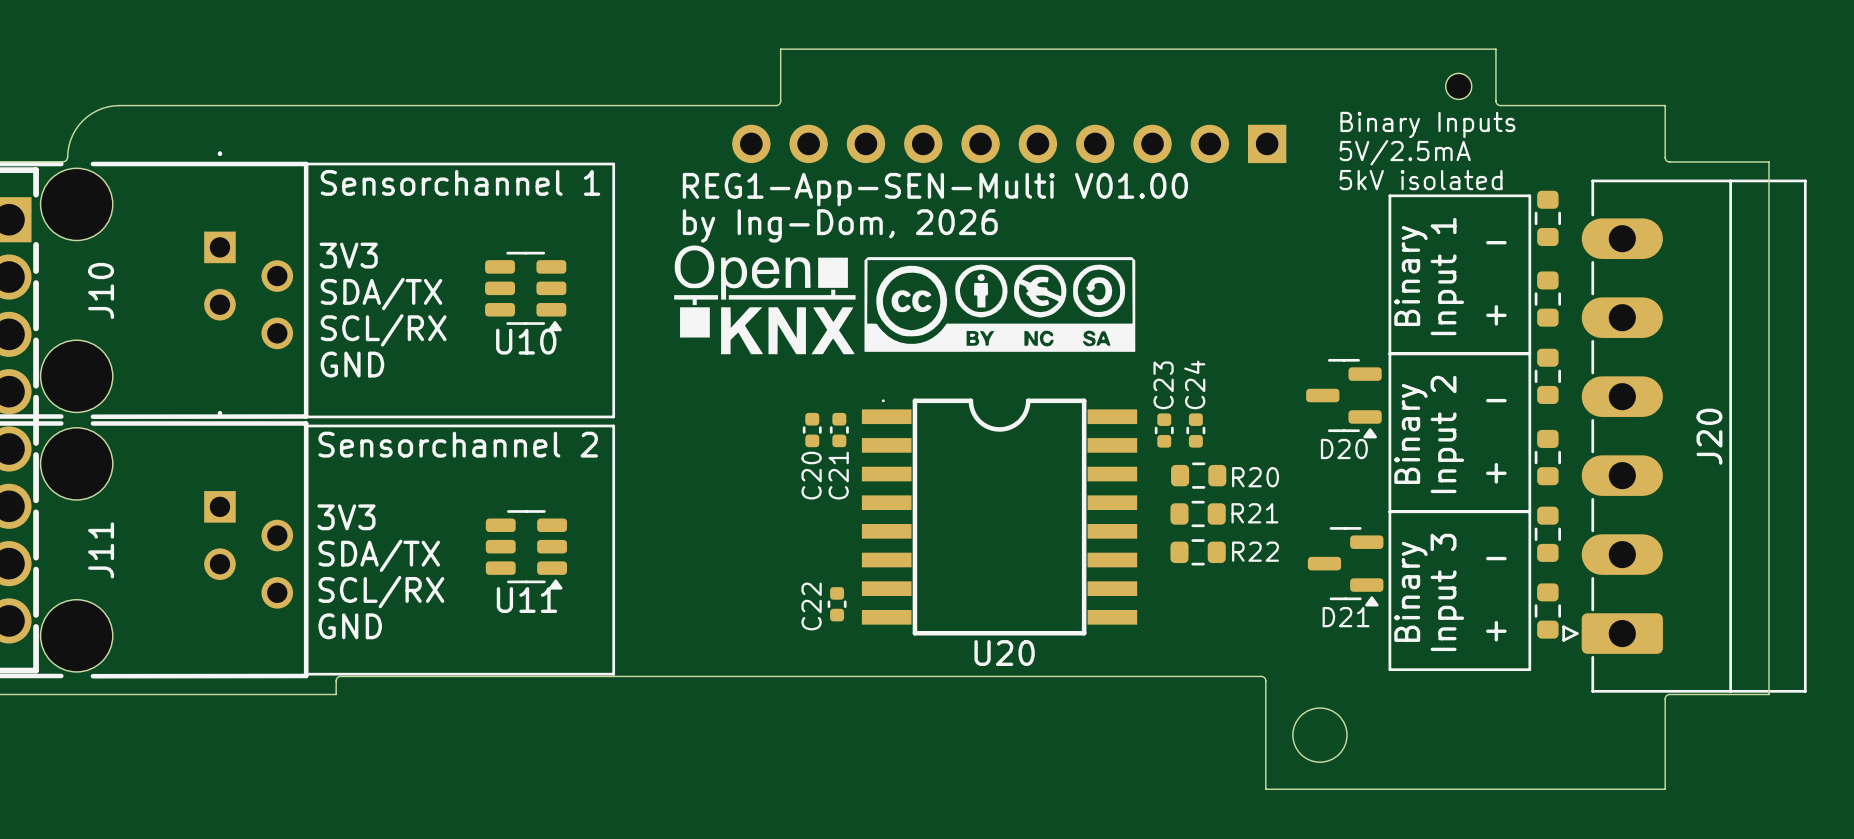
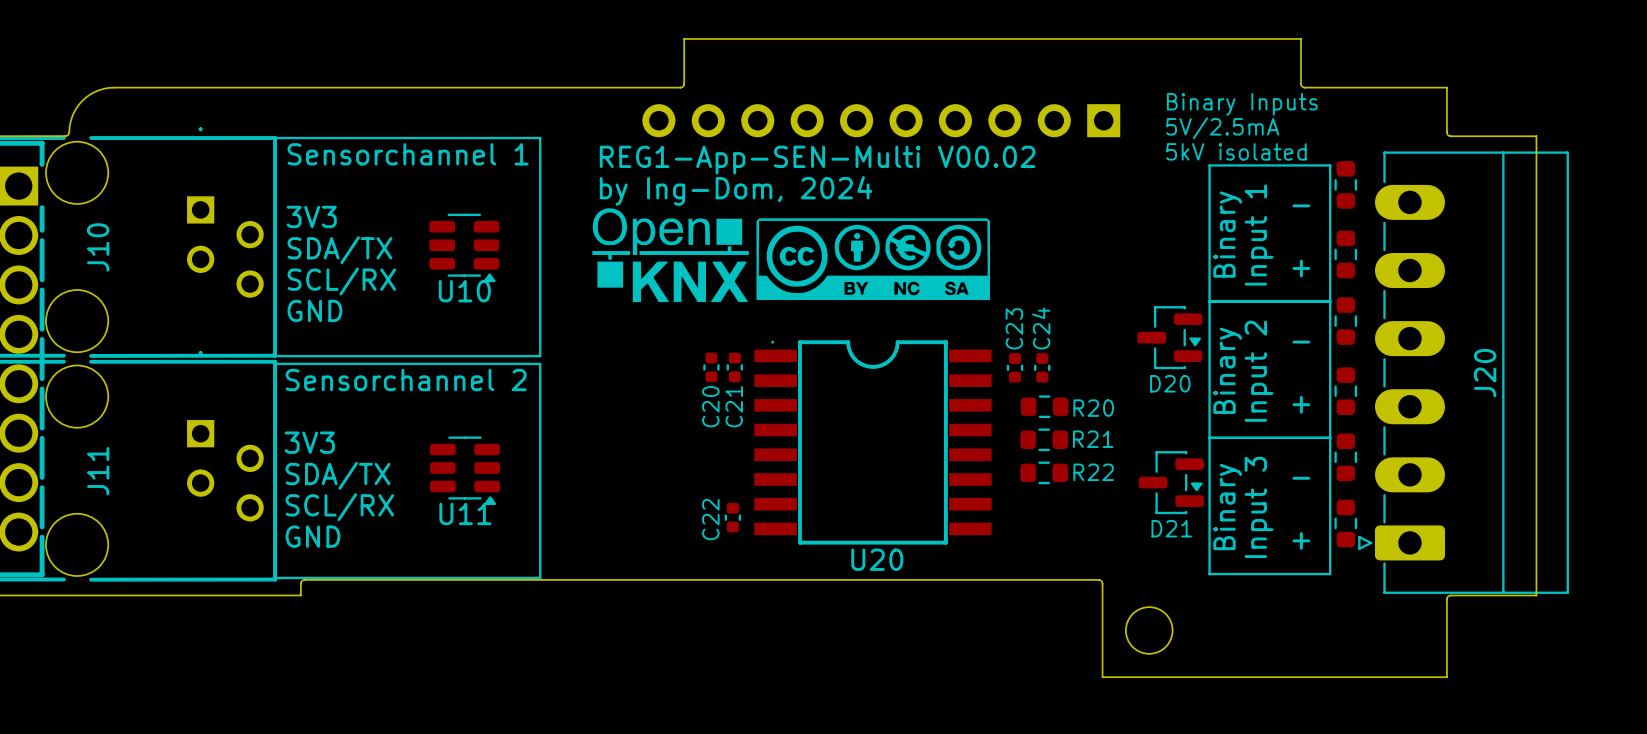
part: (1458, 86) -> none
text: REG1-App-SEN-Multi V01.00 (935, 189) -> REG1-App-SEN-Multi V00.02 (817, 160)
text: by Ing-Dom, 2026 (840, 225) -> by Ing-Dom, 2024 (736, 190)
D20 footprint: [1306, 358, 1382, 439] -> [1137, 306, 1203, 370]
D21 footprint: [1307, 527, 1384, 607] -> [1138, 451, 1204, 515]

